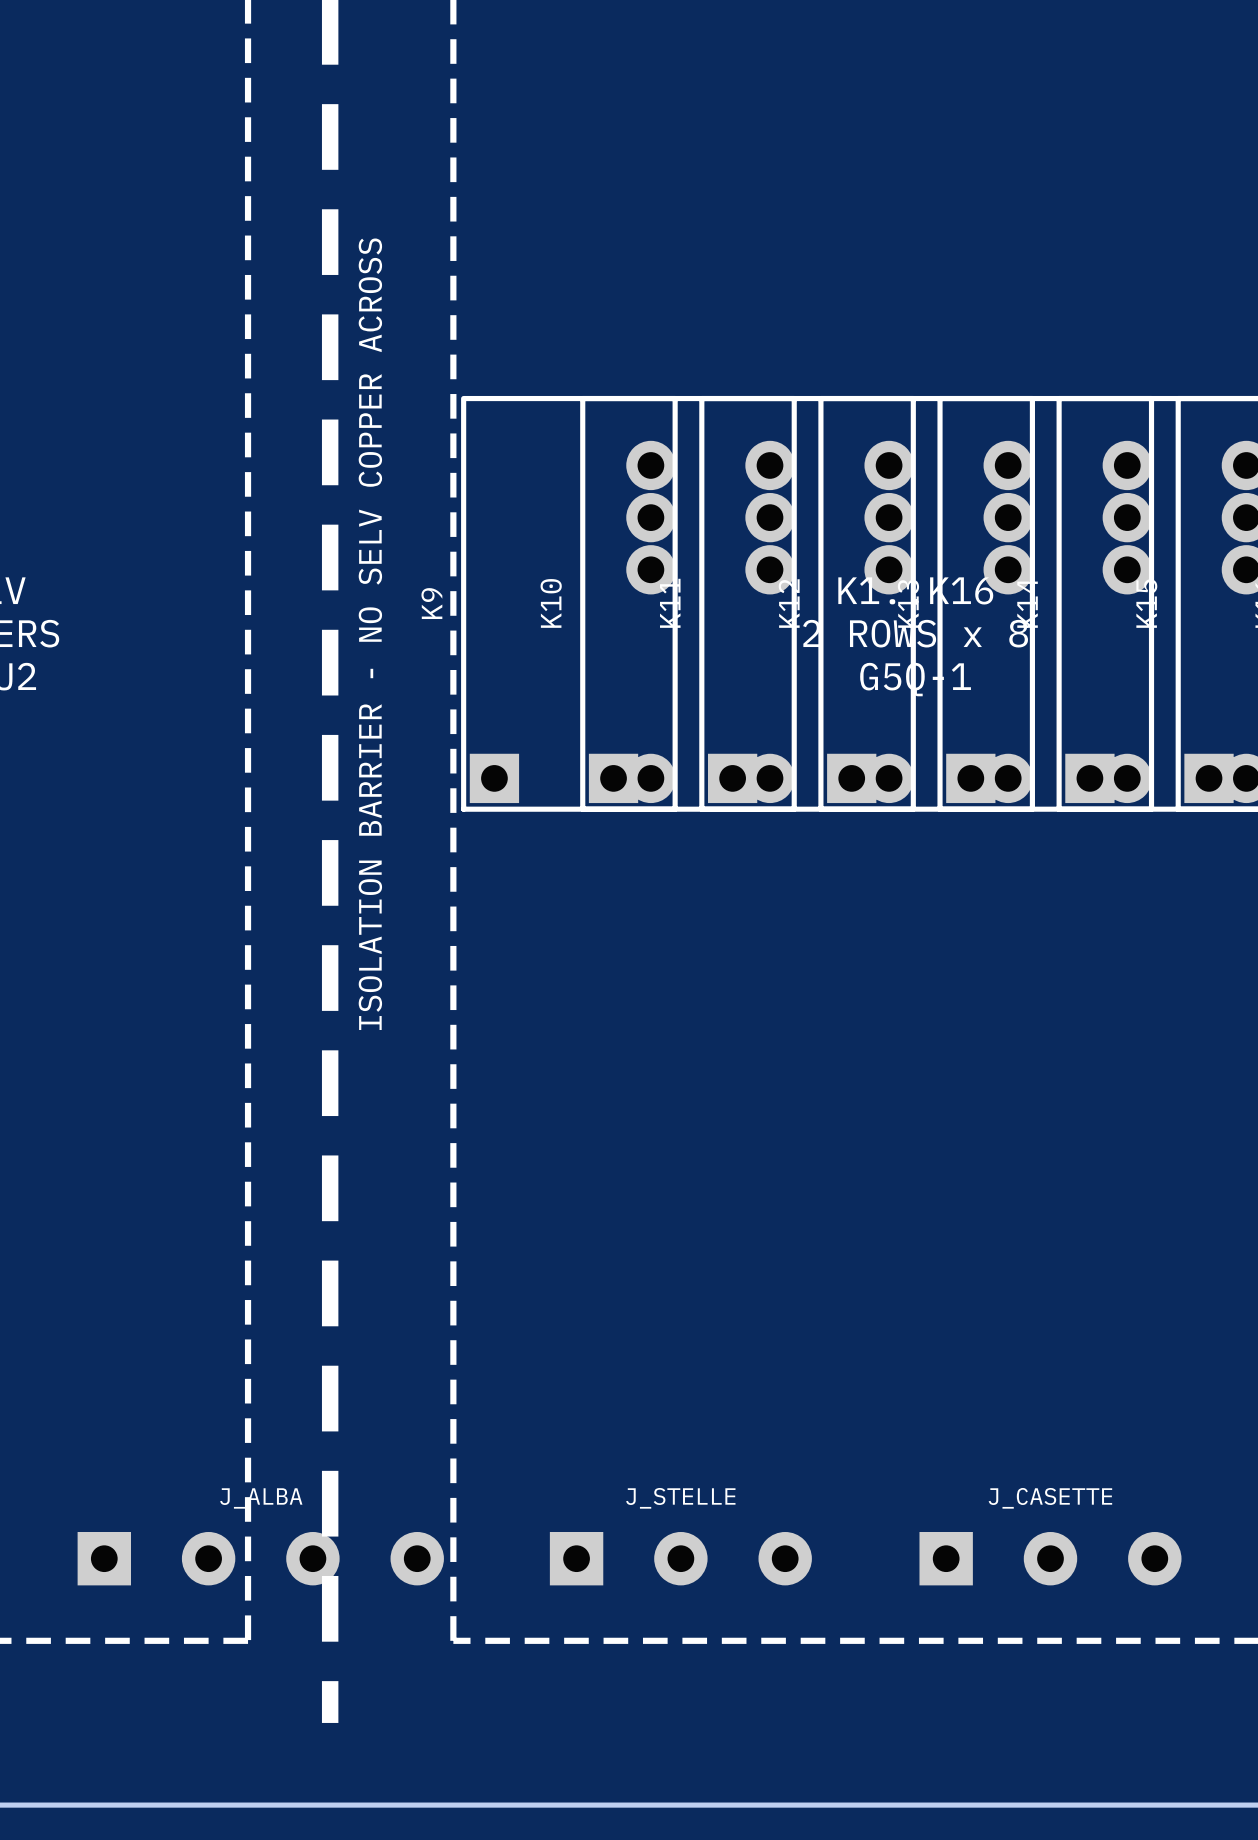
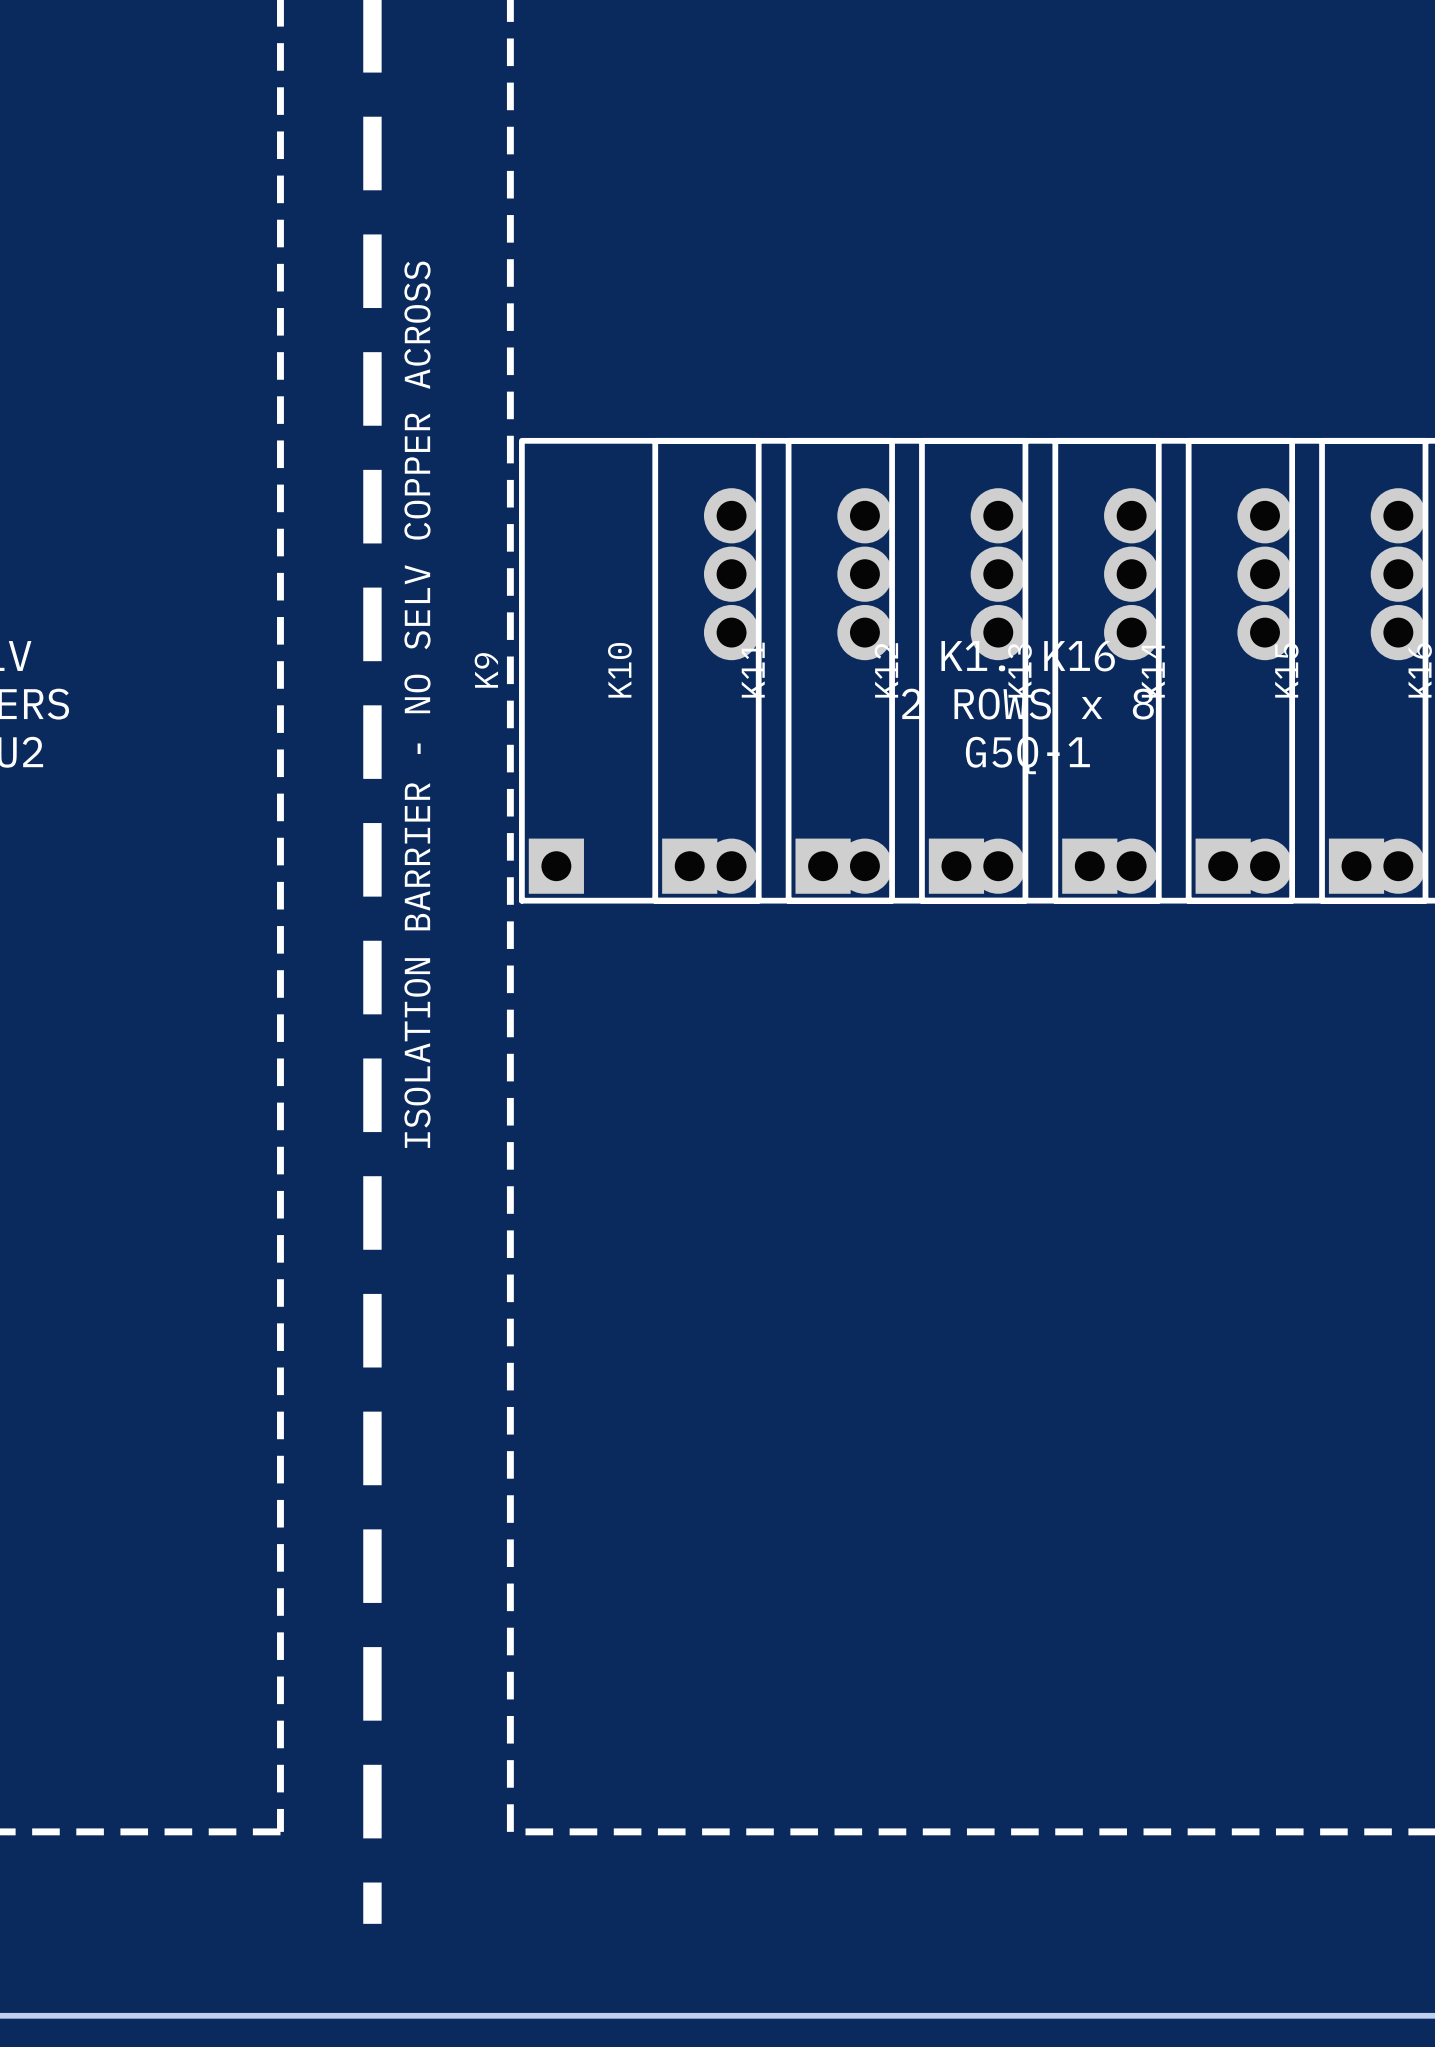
J_ALBA: (260, 1558) -> none
J_STELLE: (680, 1558) -> none
J_CASETTE: (1050, 1558) -> none

